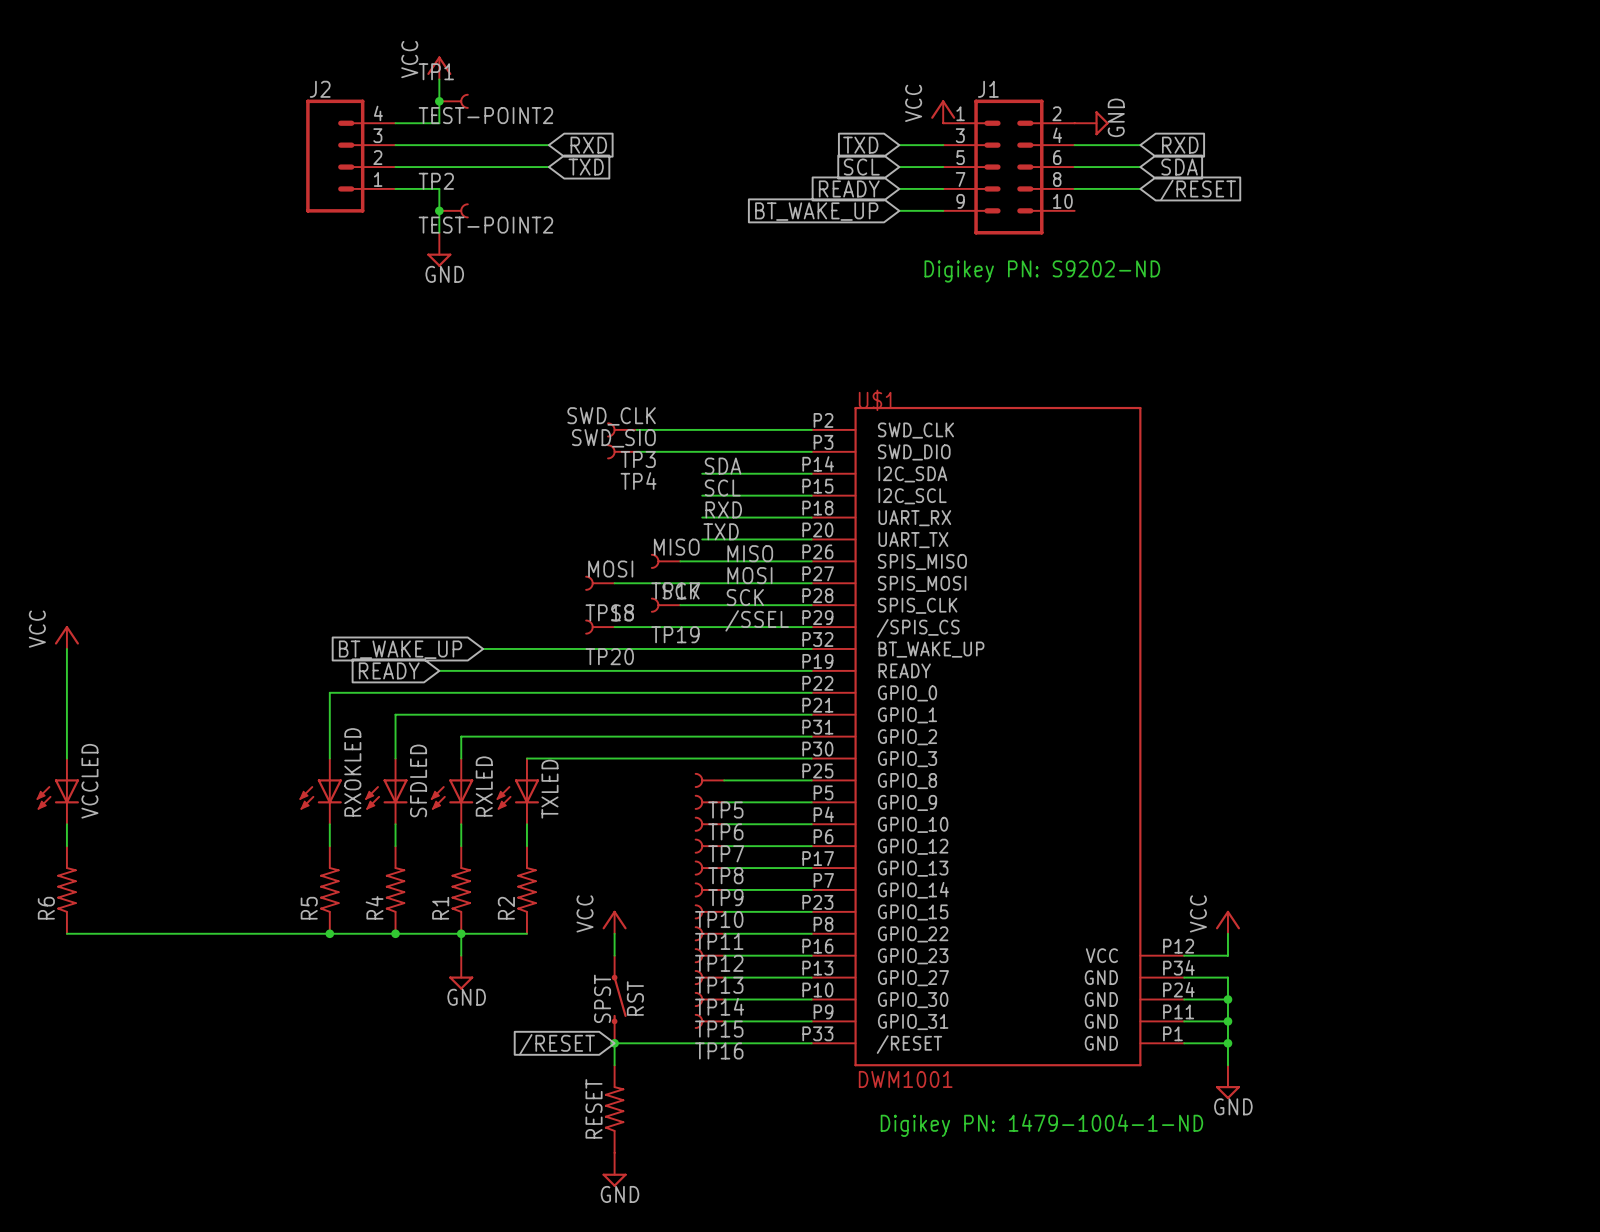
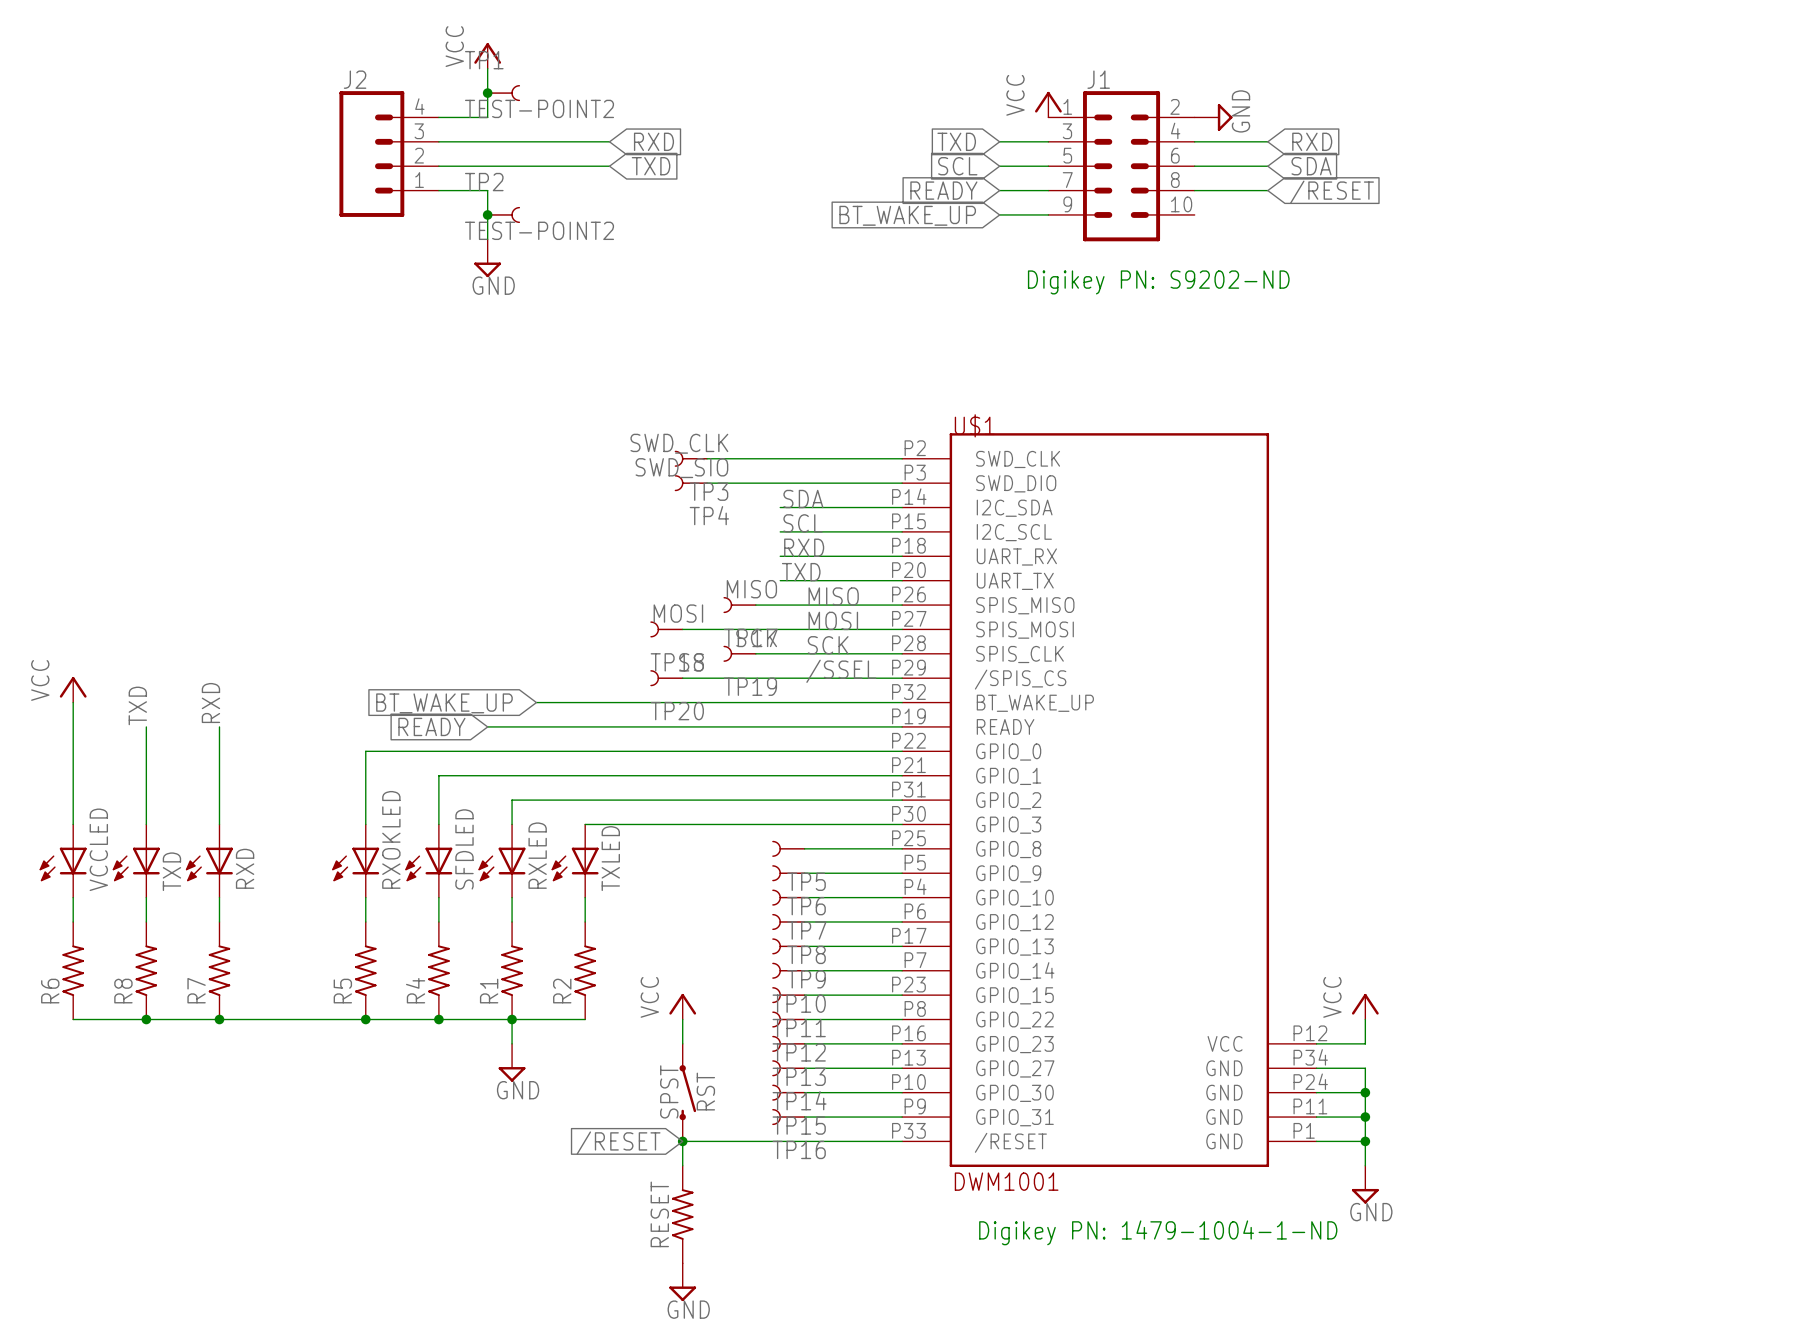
label: none -> RXD (210, 703)
label: none -> TXD (137, 705)
wire: none -> (146, 726) (146, 824)
wire: none -> (219, 726) (219, 824)
TXD: none -> (136, 861)
RXD: none -> (209, 861)
wire: none -> (146, 897) (146, 921)
wire: none -> (219, 897) (219, 921)
R8: none -> (146, 970)
R7: none -> (219, 970)
junction: none -> (146, 1019)
junction: none -> (219, 1019)

